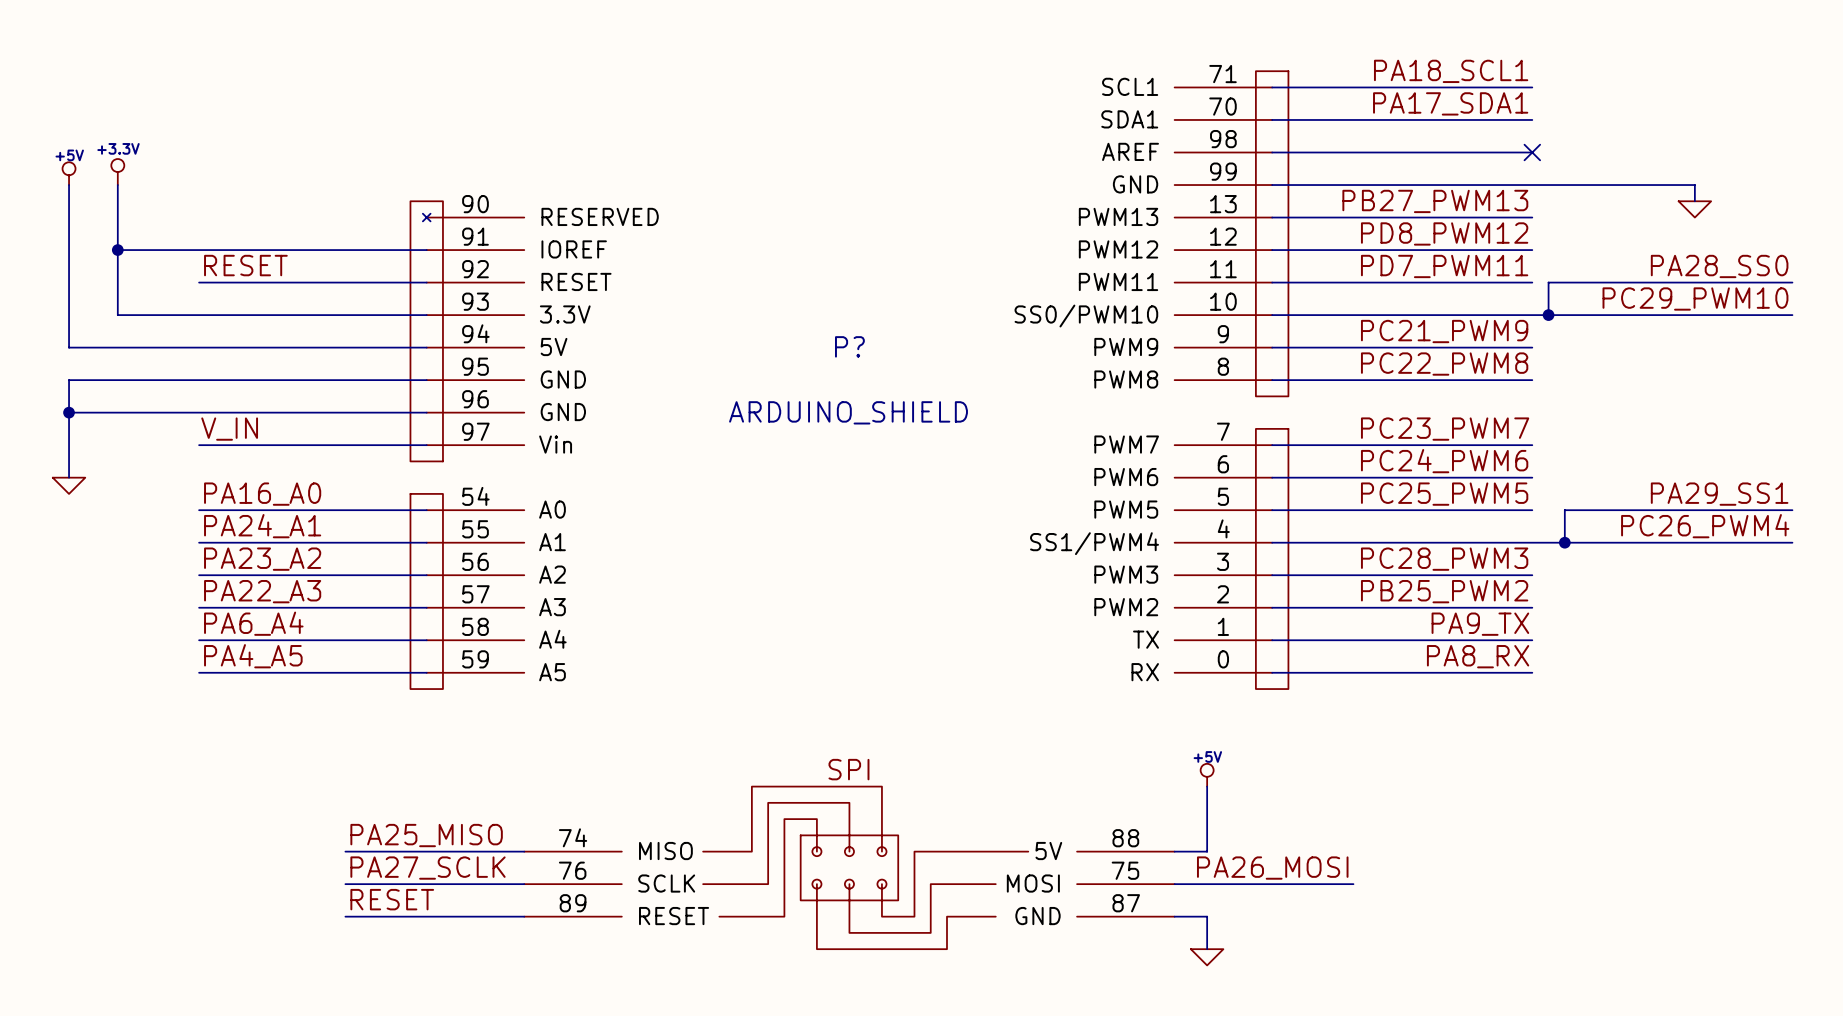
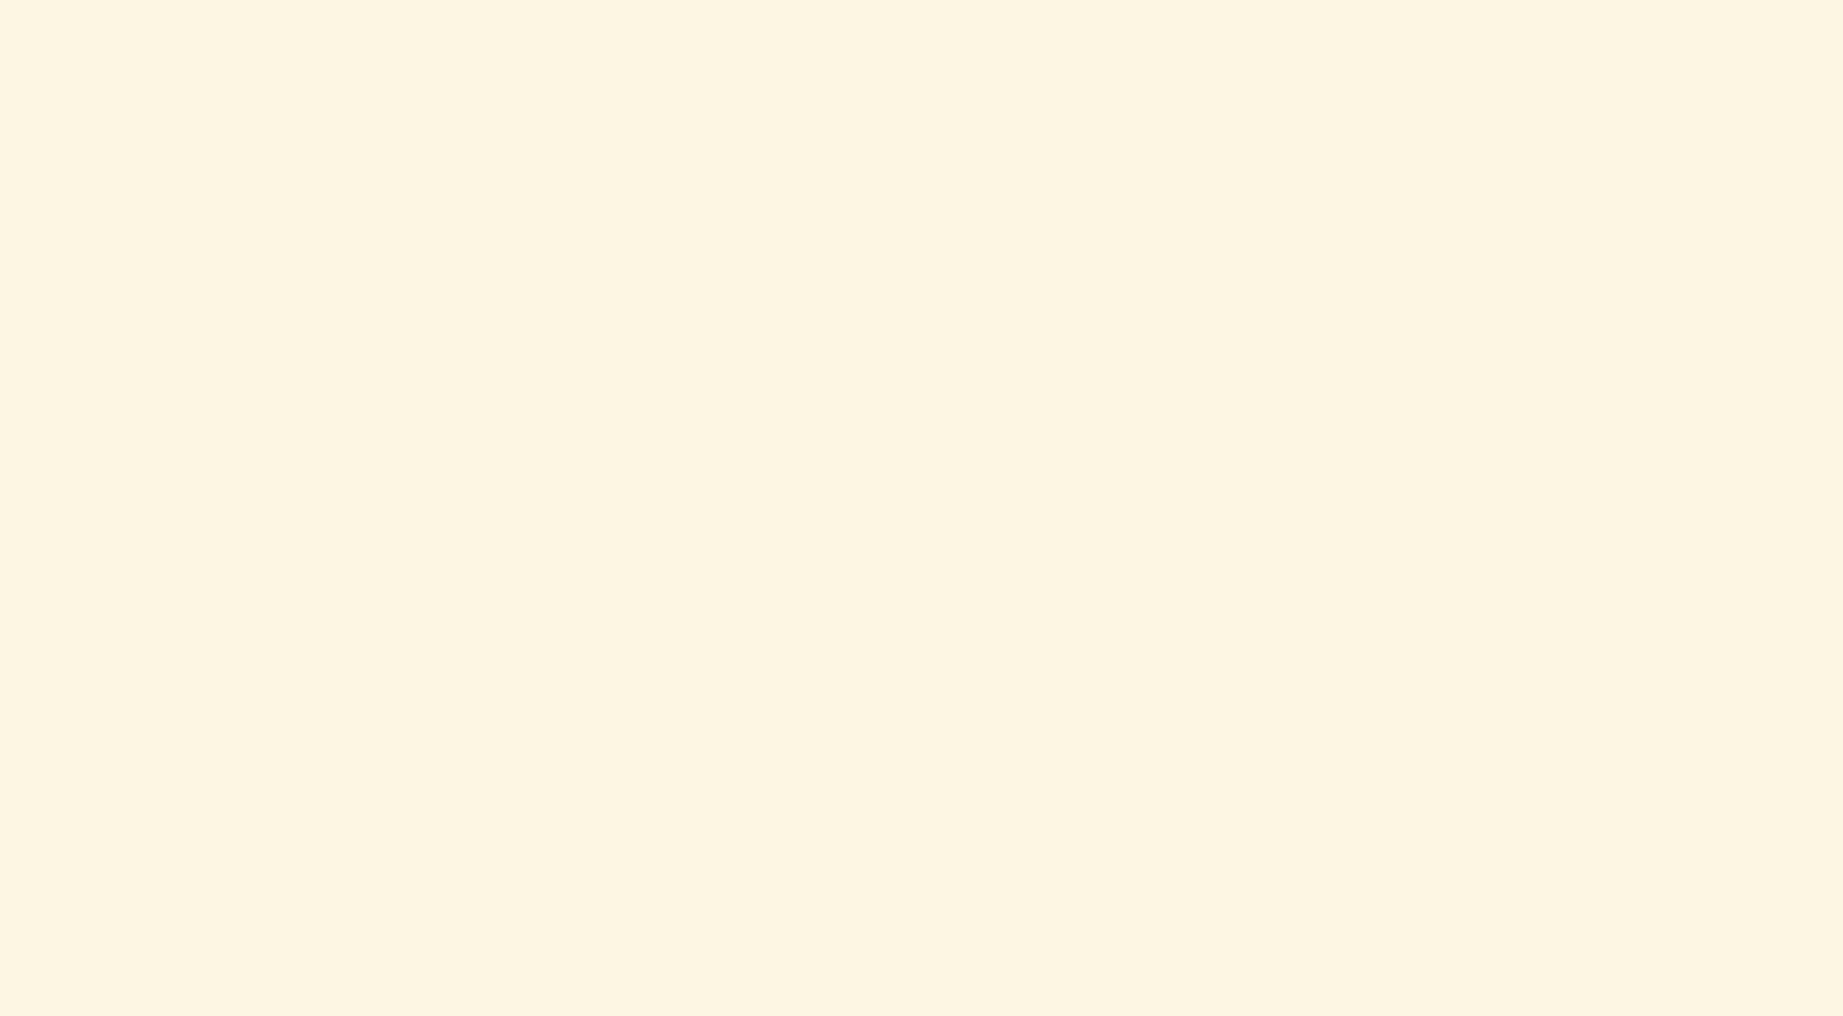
label: PA18_SCL1 (1451, 71) -> none
wire: (1272, 87) (1532, 87) -> none
label: PA17_SDA1 (1450, 103) -> none
wire: (1272, 119) (1532, 119) -> none
wire: (1272, 152) (1532, 152) -> none
no-connect mark: (1532, 152) -> none
power symbol: +3.3V (117, 172) -> none
power symbol: +5V (69, 173) -> none
wire: (69, 185) (69, 347) (426, 347) -> none
wire: (117, 185) (117, 315) (426, 315) -> none
wire: (1272, 185) (1694, 185) (1694, 201) -> none
label: PB27_PWM13 (1435, 201) -> none
power symbol: (1694, 209) -> none
wire: (1272, 217) (1532, 217) -> none
label: PD8_PWM12 (1444, 233) -> none
wire: (117, 250) (426, 250) -> none
junction: (117, 250) -> none
wire: (1272, 250) (1532, 250) -> none
label: RESET (245, 265) -> none
label: PD7_PWM11 (1444, 266) -> none
label: PA28_SS0 (1719, 266) -> none
wire: (199, 282) (426, 282) -> none
wire: (1272, 282) (1532, 282) -> none
wire: (1792, 282) (1548, 282) (1548, 315) -> none
label: PC29_PWM10 (1695, 298) -> none
wire: (1272, 315) (1792, 315) -> none
junction: (1548, 315) -> none
label: PC21_PWM9 (1444, 331) -> none
wire: (1272, 347) (1532, 347) -> none
label: PC22_PWM8 (1444, 364) -> none
wire: (426, 380) (69, 380) (69, 477) -> none
wire: (1272, 380) (1532, 380) -> none
wire: (69, 412) (426, 412) -> none
junction: (69, 412) -> none
label: V_IN (229, 429) -> none
label: PC23_PWM7 (1445, 429) -> none
wire: (199, 445) (426, 445) -> none
wire: (1272, 445) (1532, 445) -> none
label: PC24_PWM6 (1444, 461) -> none
wire: (1272, 477) (1532, 477) -> none
power symbol: (69, 485) -> none
label: PA16_A0 (262, 494) -> none
label: PC25_PWM5 (1444, 494) -> none
label: PA29_SS1 (1719, 494) -> none
wire: (199, 510) (426, 510) -> none
P?: ARDUINO_SHIELD (849, 510) -> none
wire: (1272, 510) (1532, 510) -> none
wire: (1792, 510) (1564, 510) (1564, 542) -> none
label: PA24_A1 (262, 526) -> none
label: PC26_PWM4 (1705, 526) -> none
wire: (199, 542) (426, 542) -> none
wire: (1272, 542) (1792, 542) -> none
junction: (1564, 542) -> none
label: PA23_A2 (262, 559) -> none
label: PC28_PWM3 (1444, 559) -> none
wire: (199, 575) (426, 575) -> none
wire: (1272, 575) (1532, 575) -> none
label: PA22_A3 (262, 591) -> none
label: PB25_PWM2 (1444, 591) -> none
wire: (199, 607) (426, 607) -> none
wire: (1272, 607) (1532, 607) -> none
label: PA6_A4 (253, 623) -> none
label: PA9_TX (1480, 624) -> none
wire: (199, 640) (426, 640) -> none
wire: (1272, 640) (1532, 640) -> none
label: PA4_A5 (253, 656) -> none
label: PA8_RX (1478, 656) -> none
wire: (199, 672) (426, 672) -> none
wire: (1272, 672) (1532, 672) -> none
power symbol: +5V (1207, 775) -> none
wire: (1207, 786) (1207, 851) (1174, 851) -> none
label: PA25_MISO (426, 835) -> none
wire: (345, 851) (524, 851) -> none
label: PA27_SCLK (428, 868) -> none
label: PA26_MOSI (1272, 868) -> none
wire: (345, 884) (524, 884) -> none
wire: (1174, 884) (1353, 884) -> none
label: RESET (392, 899) -> none
wire: (345, 916) (524, 916) -> none
wire: (1174, 916) (1207, 916) (1207, 949) -> none
power symbol: (1207, 957) -> none

